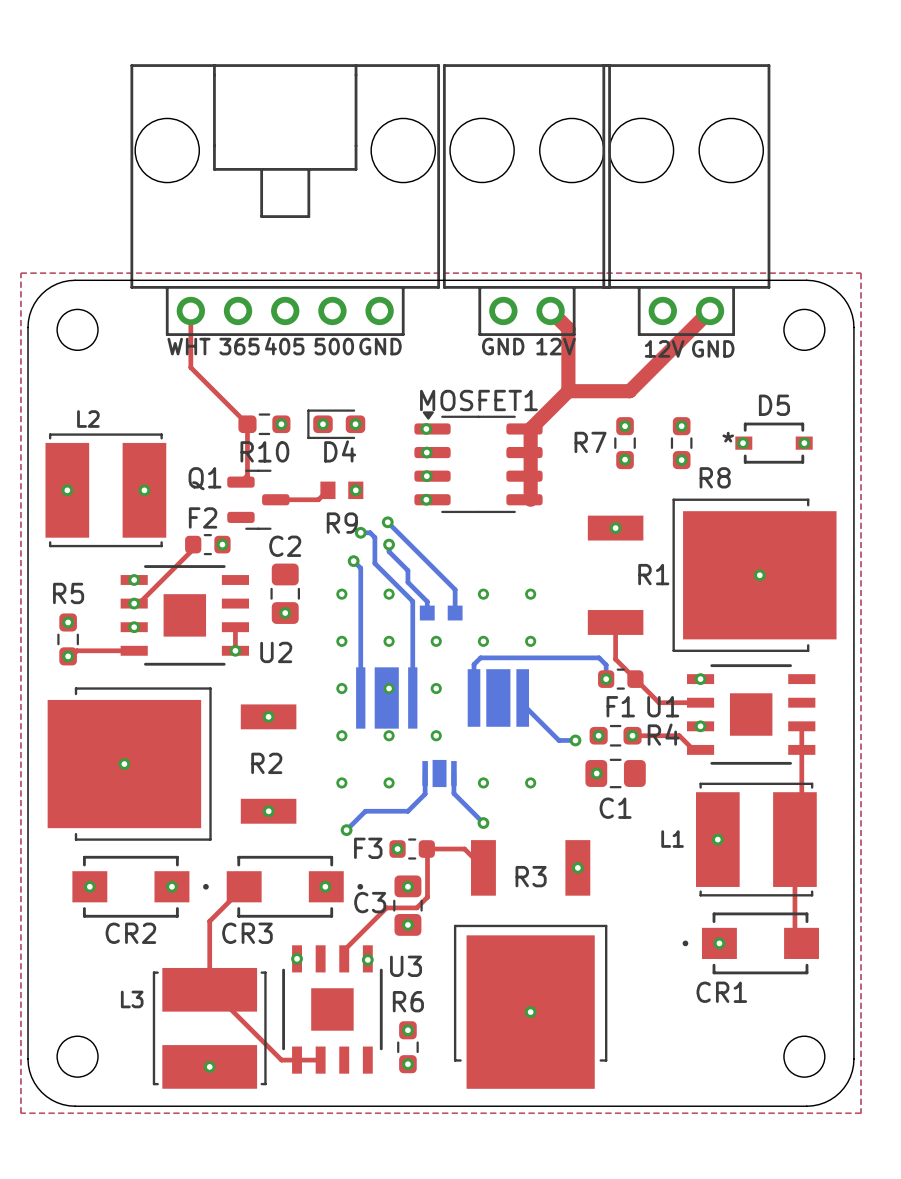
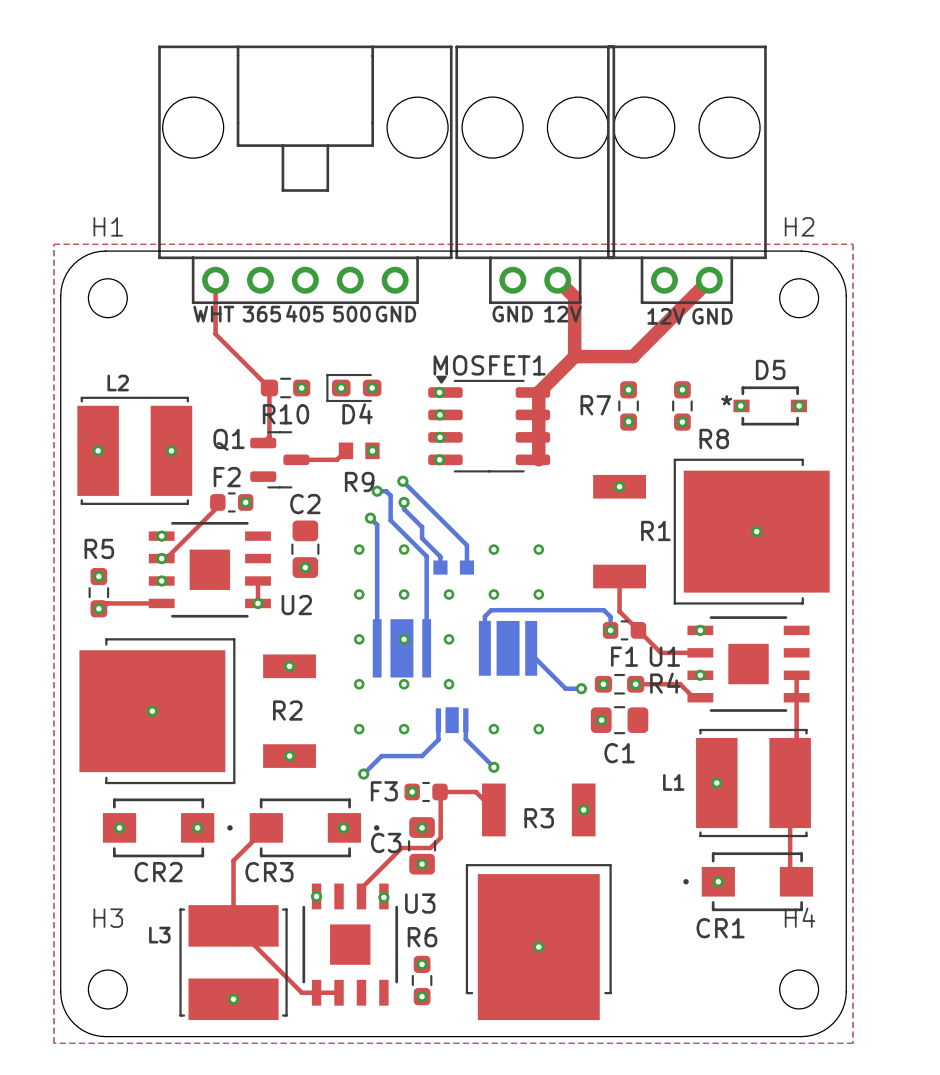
H1 name: none -> H1 (108, 226)
H2 name: none -> H2 (799, 226)
H3 name: none -> H3 (108, 918)
H4 name: none -> H4 (799, 917)

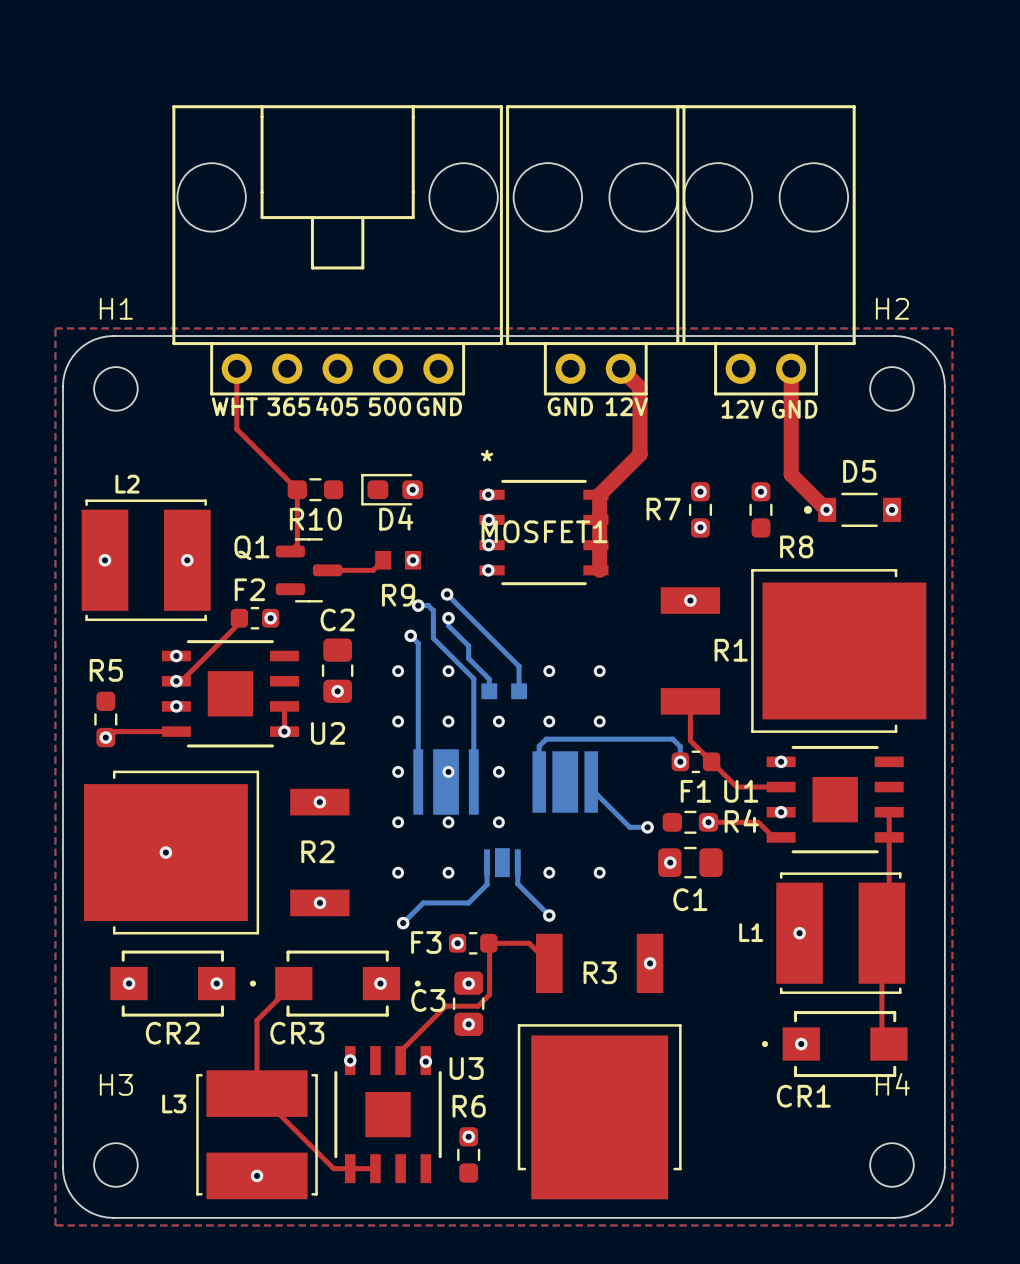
top track: (709, 280) (633, 356) (574, 356) -> (791, 368) (791, 474) (826, 509)
MOSFET1 name position: MOSFET1 (489, 365) -> MOSFET1 (544, 531)
MOSFET1 footprint: [428, 375, 551, 473] -> [479, 479, 609, 586]
D5 footprint: [733, 386, 808, 426] -> [803, 492, 902, 528]
via: (301, 387) -> none
via: (341, 387) -> none
via: (682, 422) -> none
via: (756, 531) -> none
via: (98, 576) -> none
via: (603, 684) -> none
via: (538, 947) -> none
via: (422, 996) -> none

